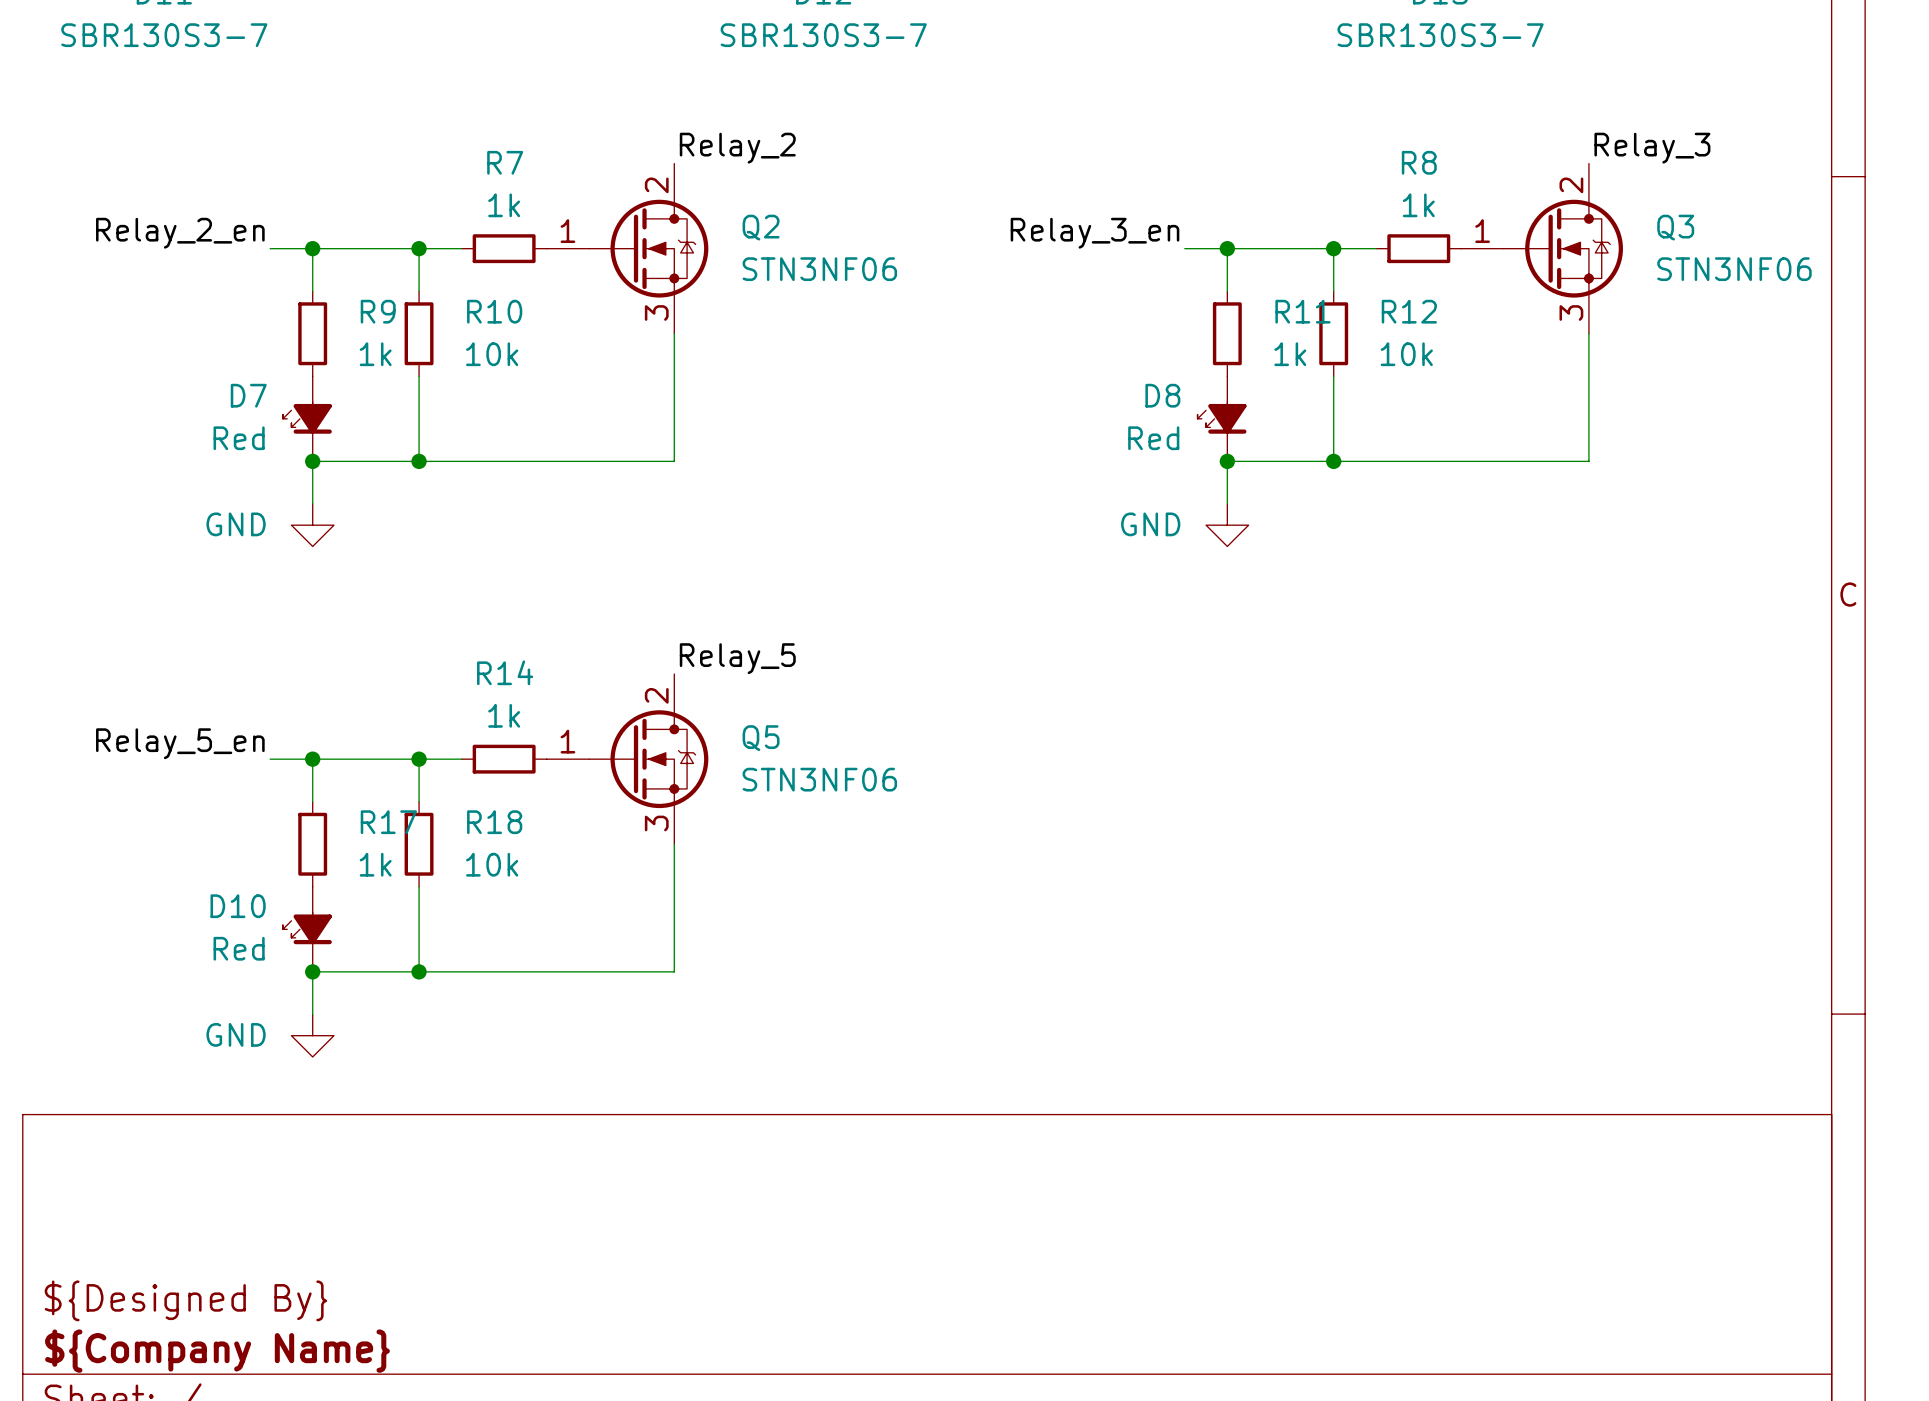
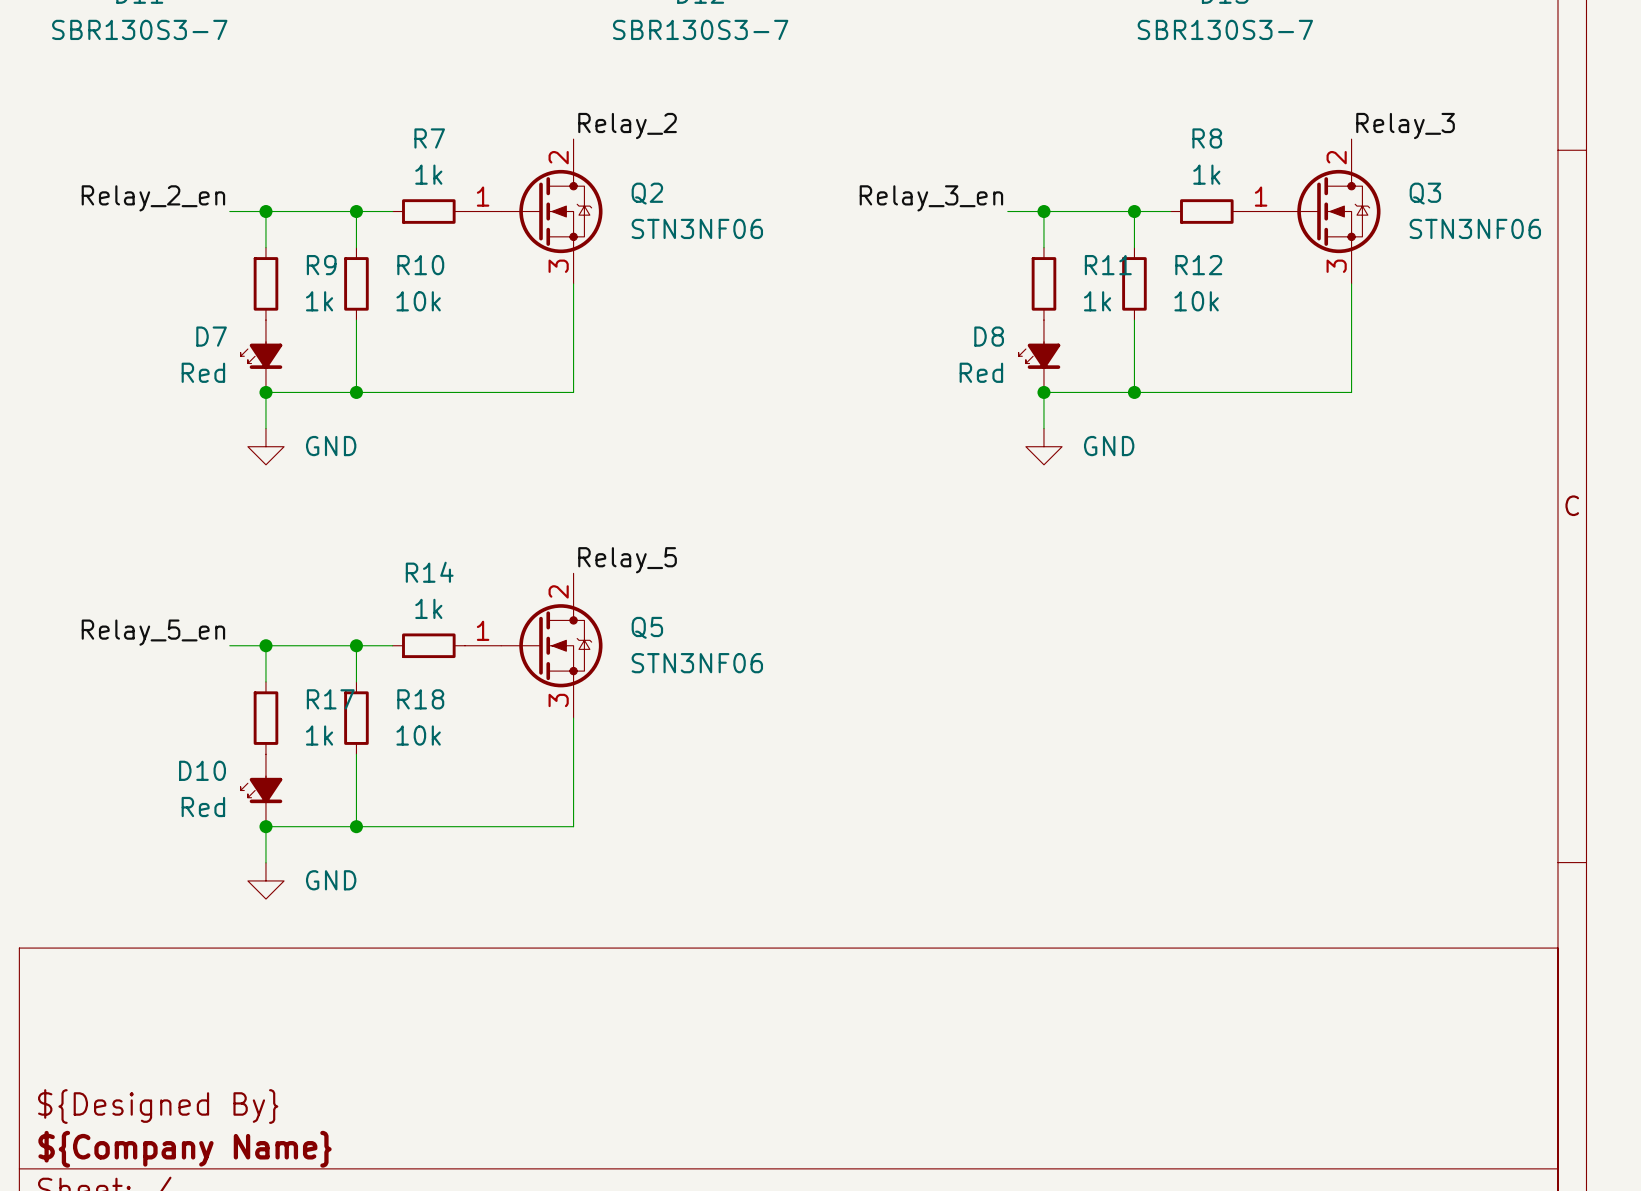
power symbol text position: GND (236, 524) -> GND (331, 446)
power symbol text position: GND (1150, 524) -> GND (1109, 446)
power symbol text position: GND (236, 1034) -> GND (331, 880)

